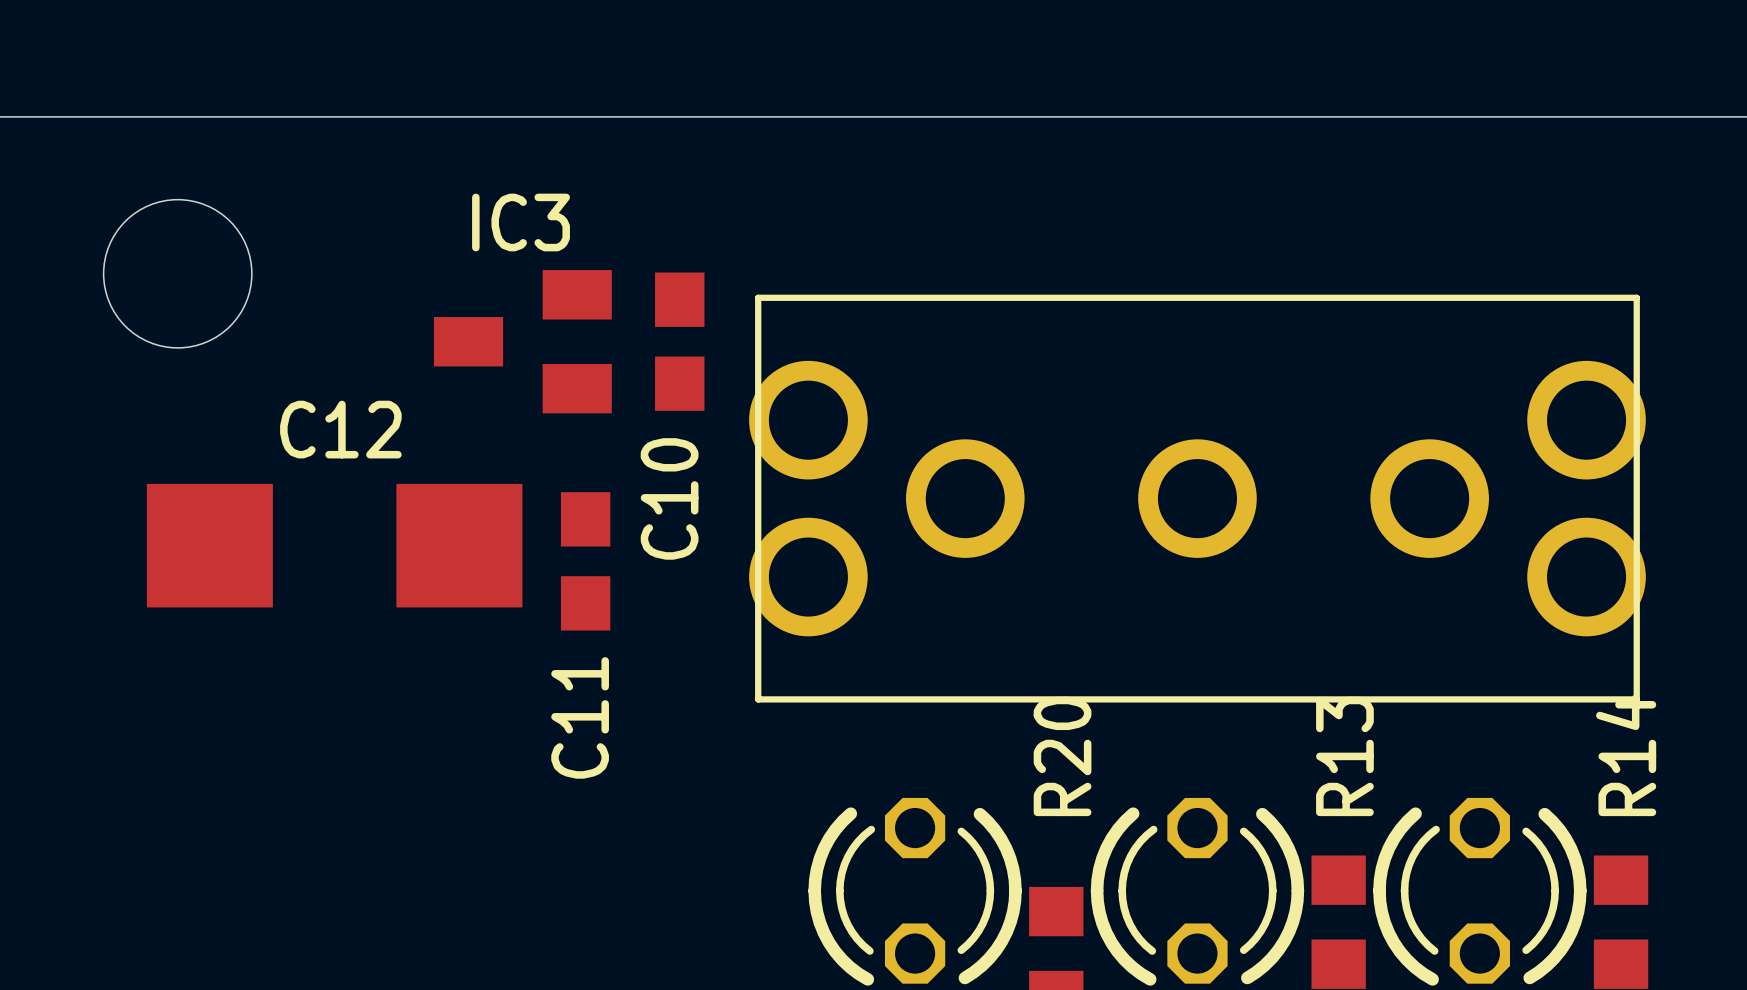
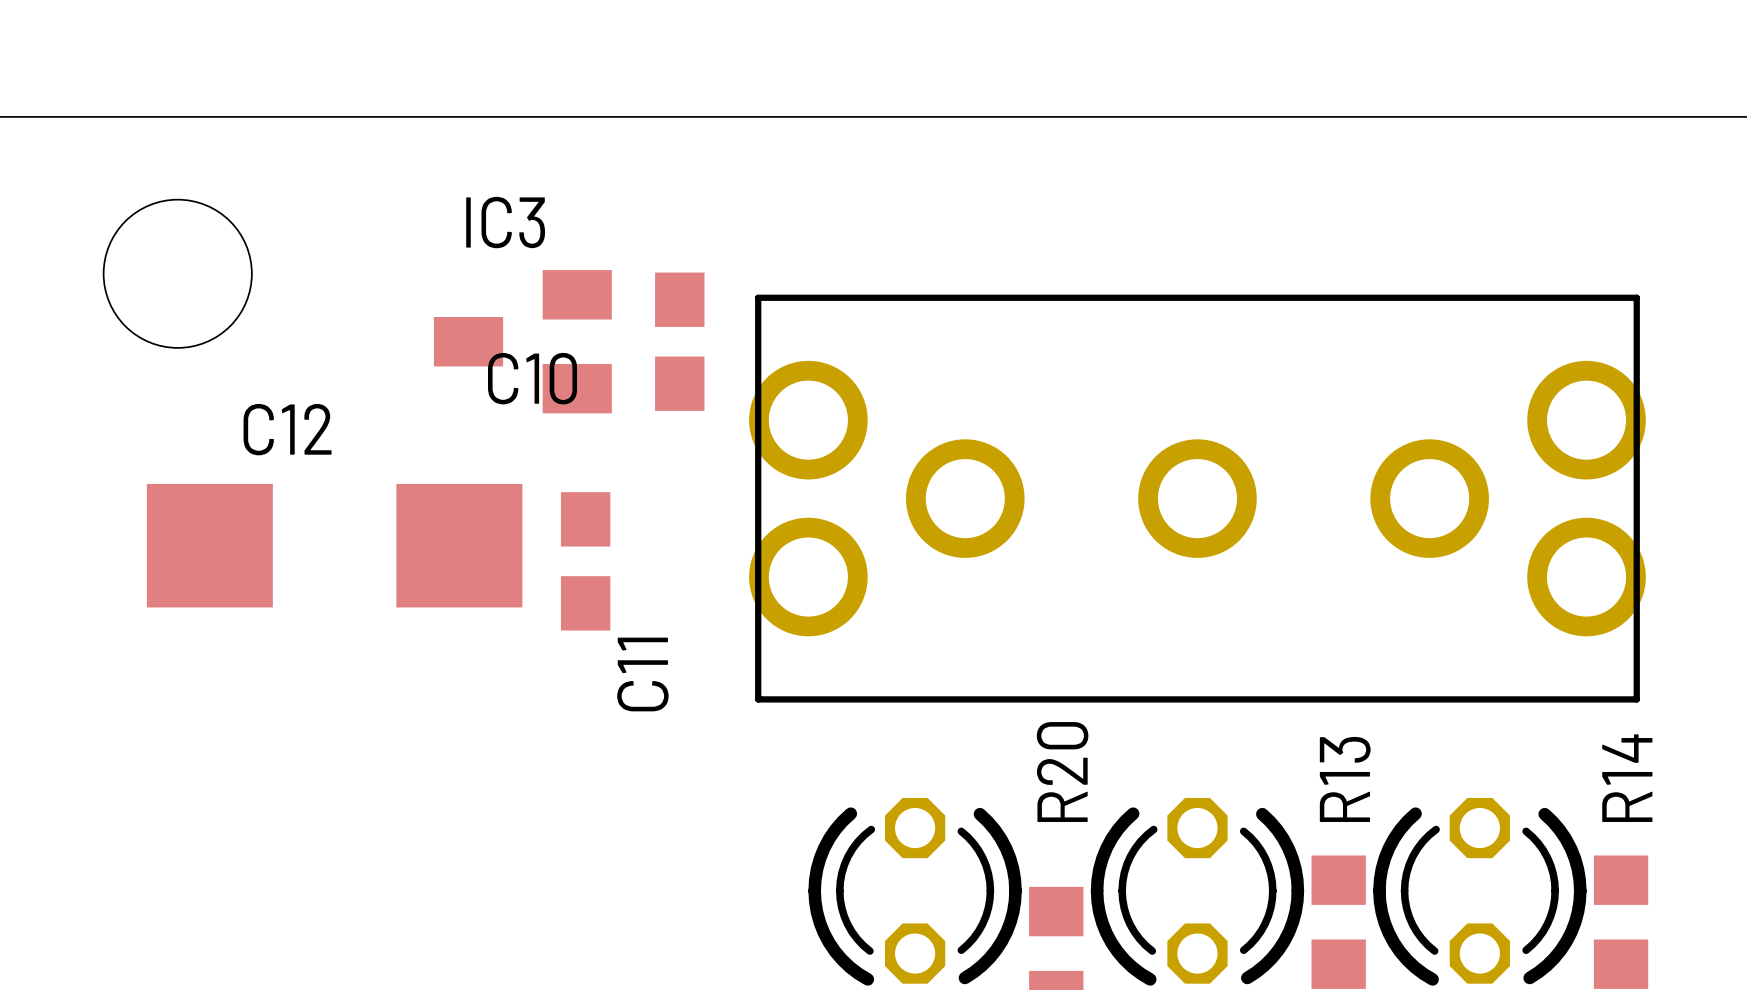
C12 name position: C12 (340, 429) -> C12 (287, 429)
C10 name rotation: 0° (669, 498) -> 90° clockwise (532, 378)
C11 name position: C11 (580, 717) -> C11 (642, 674)

